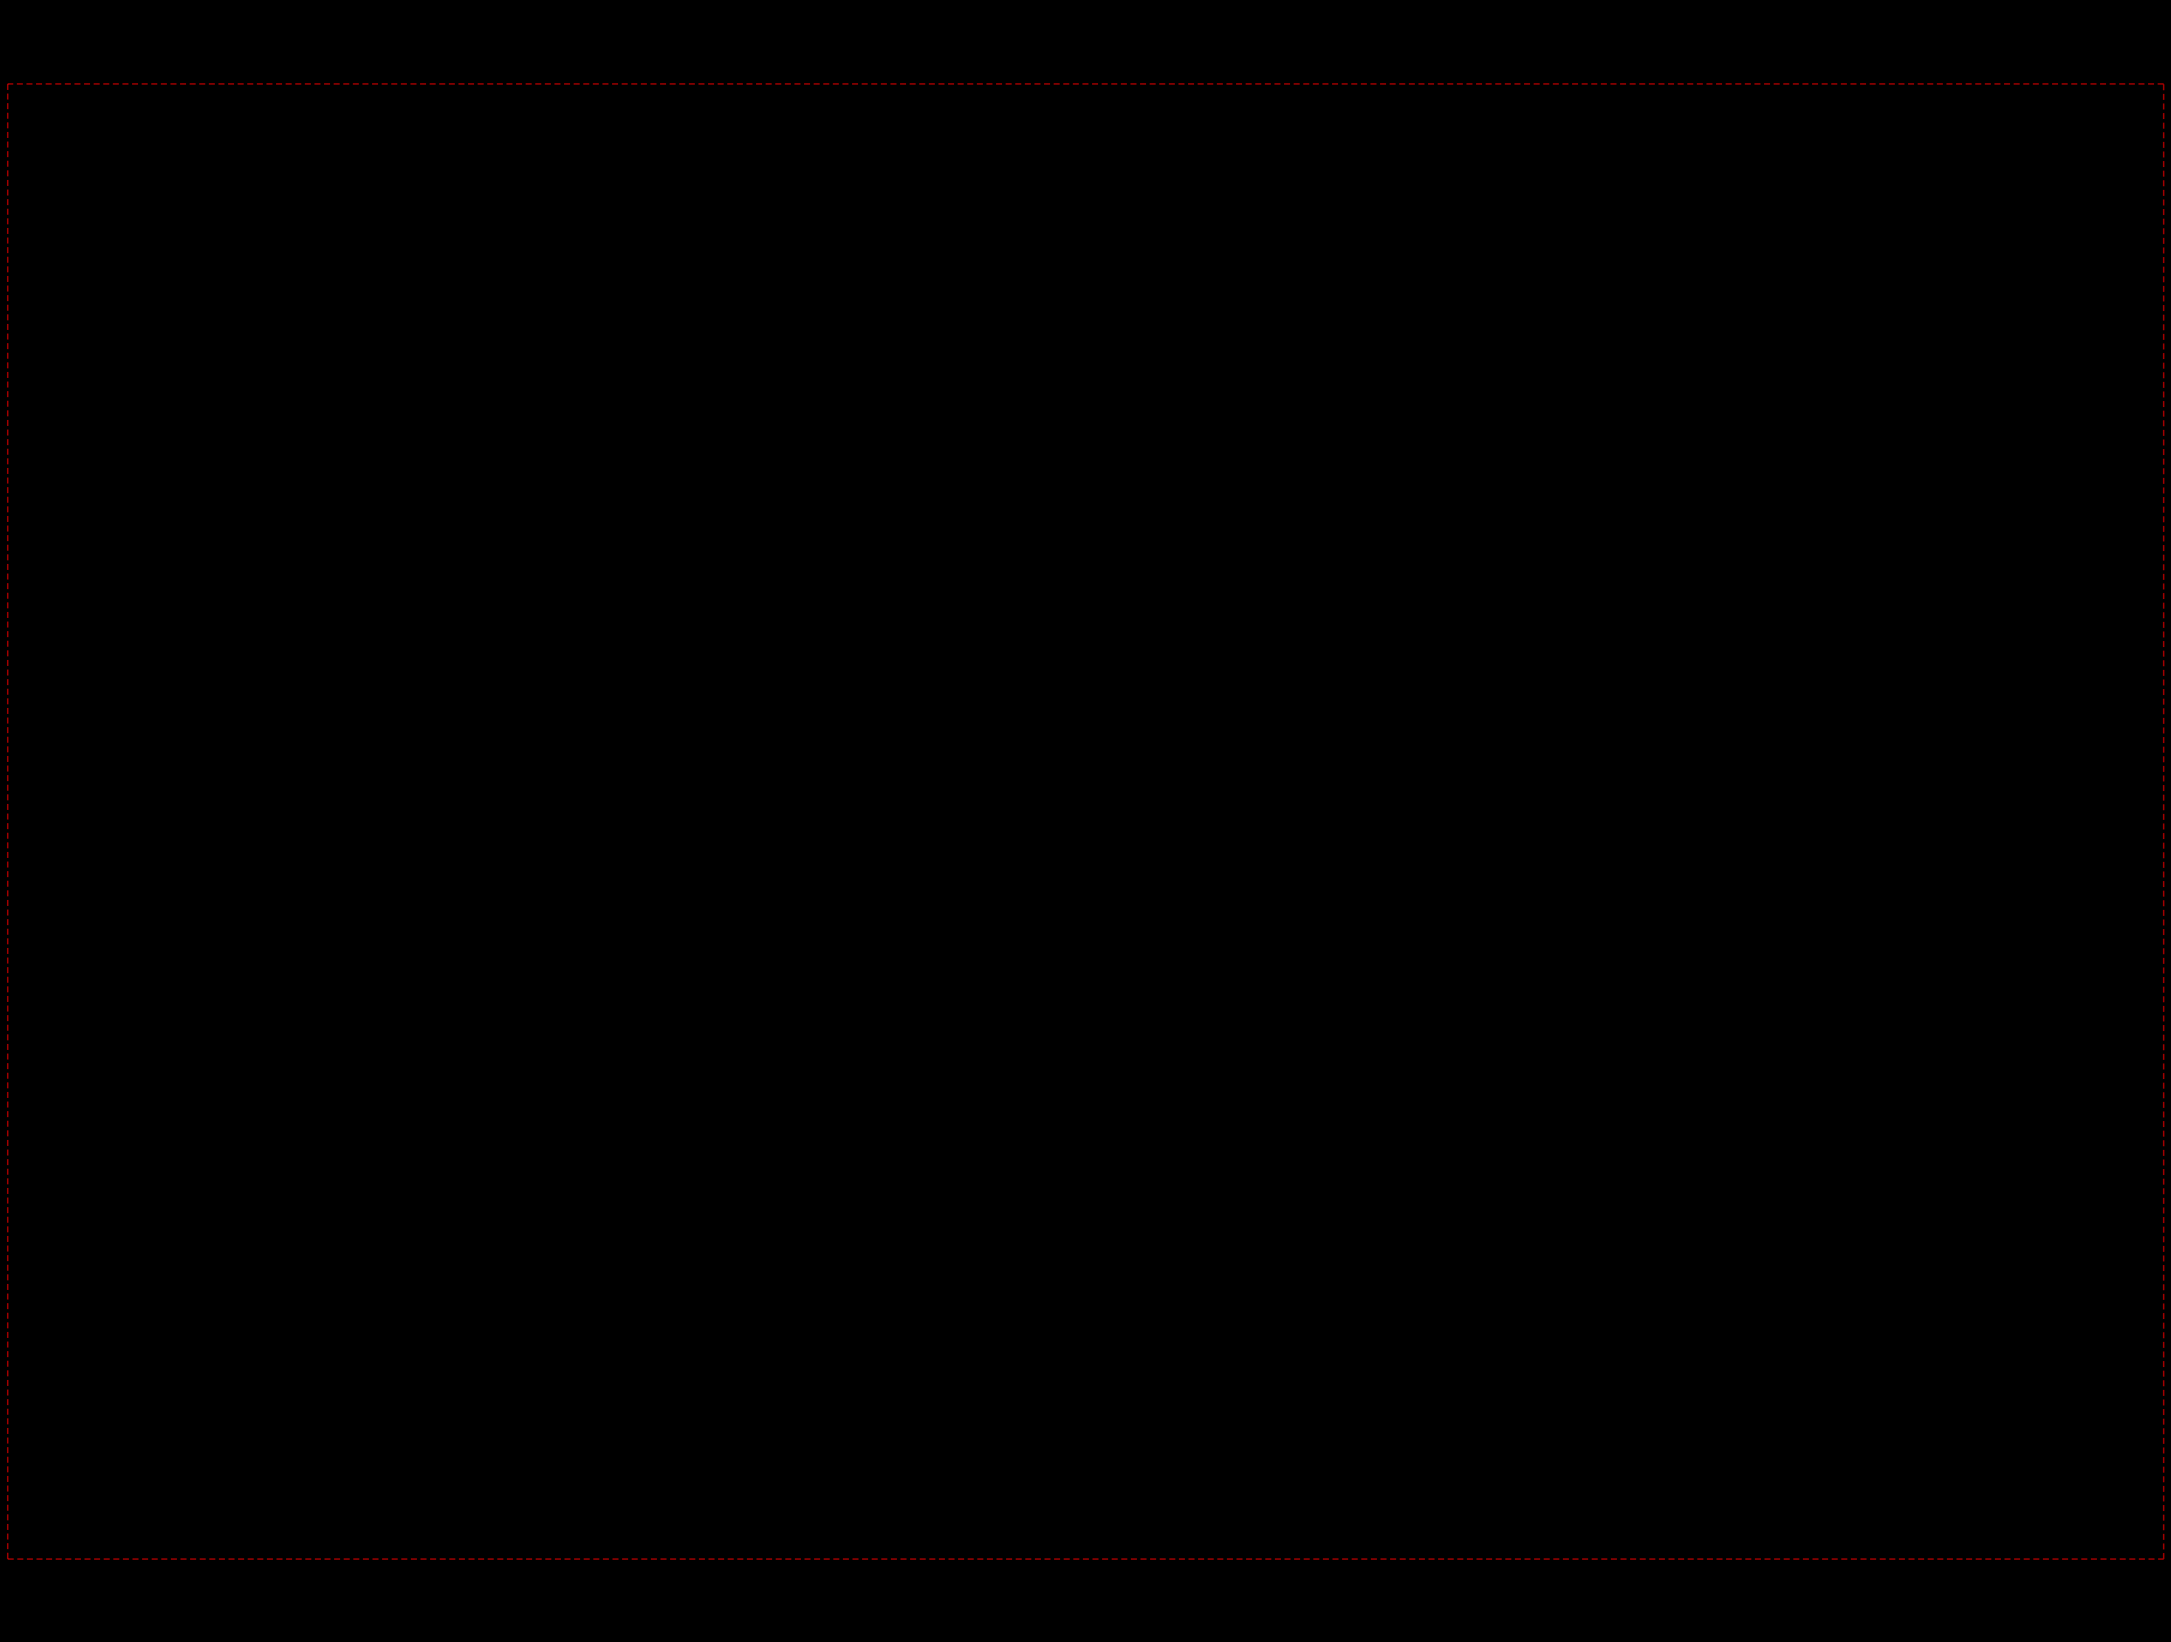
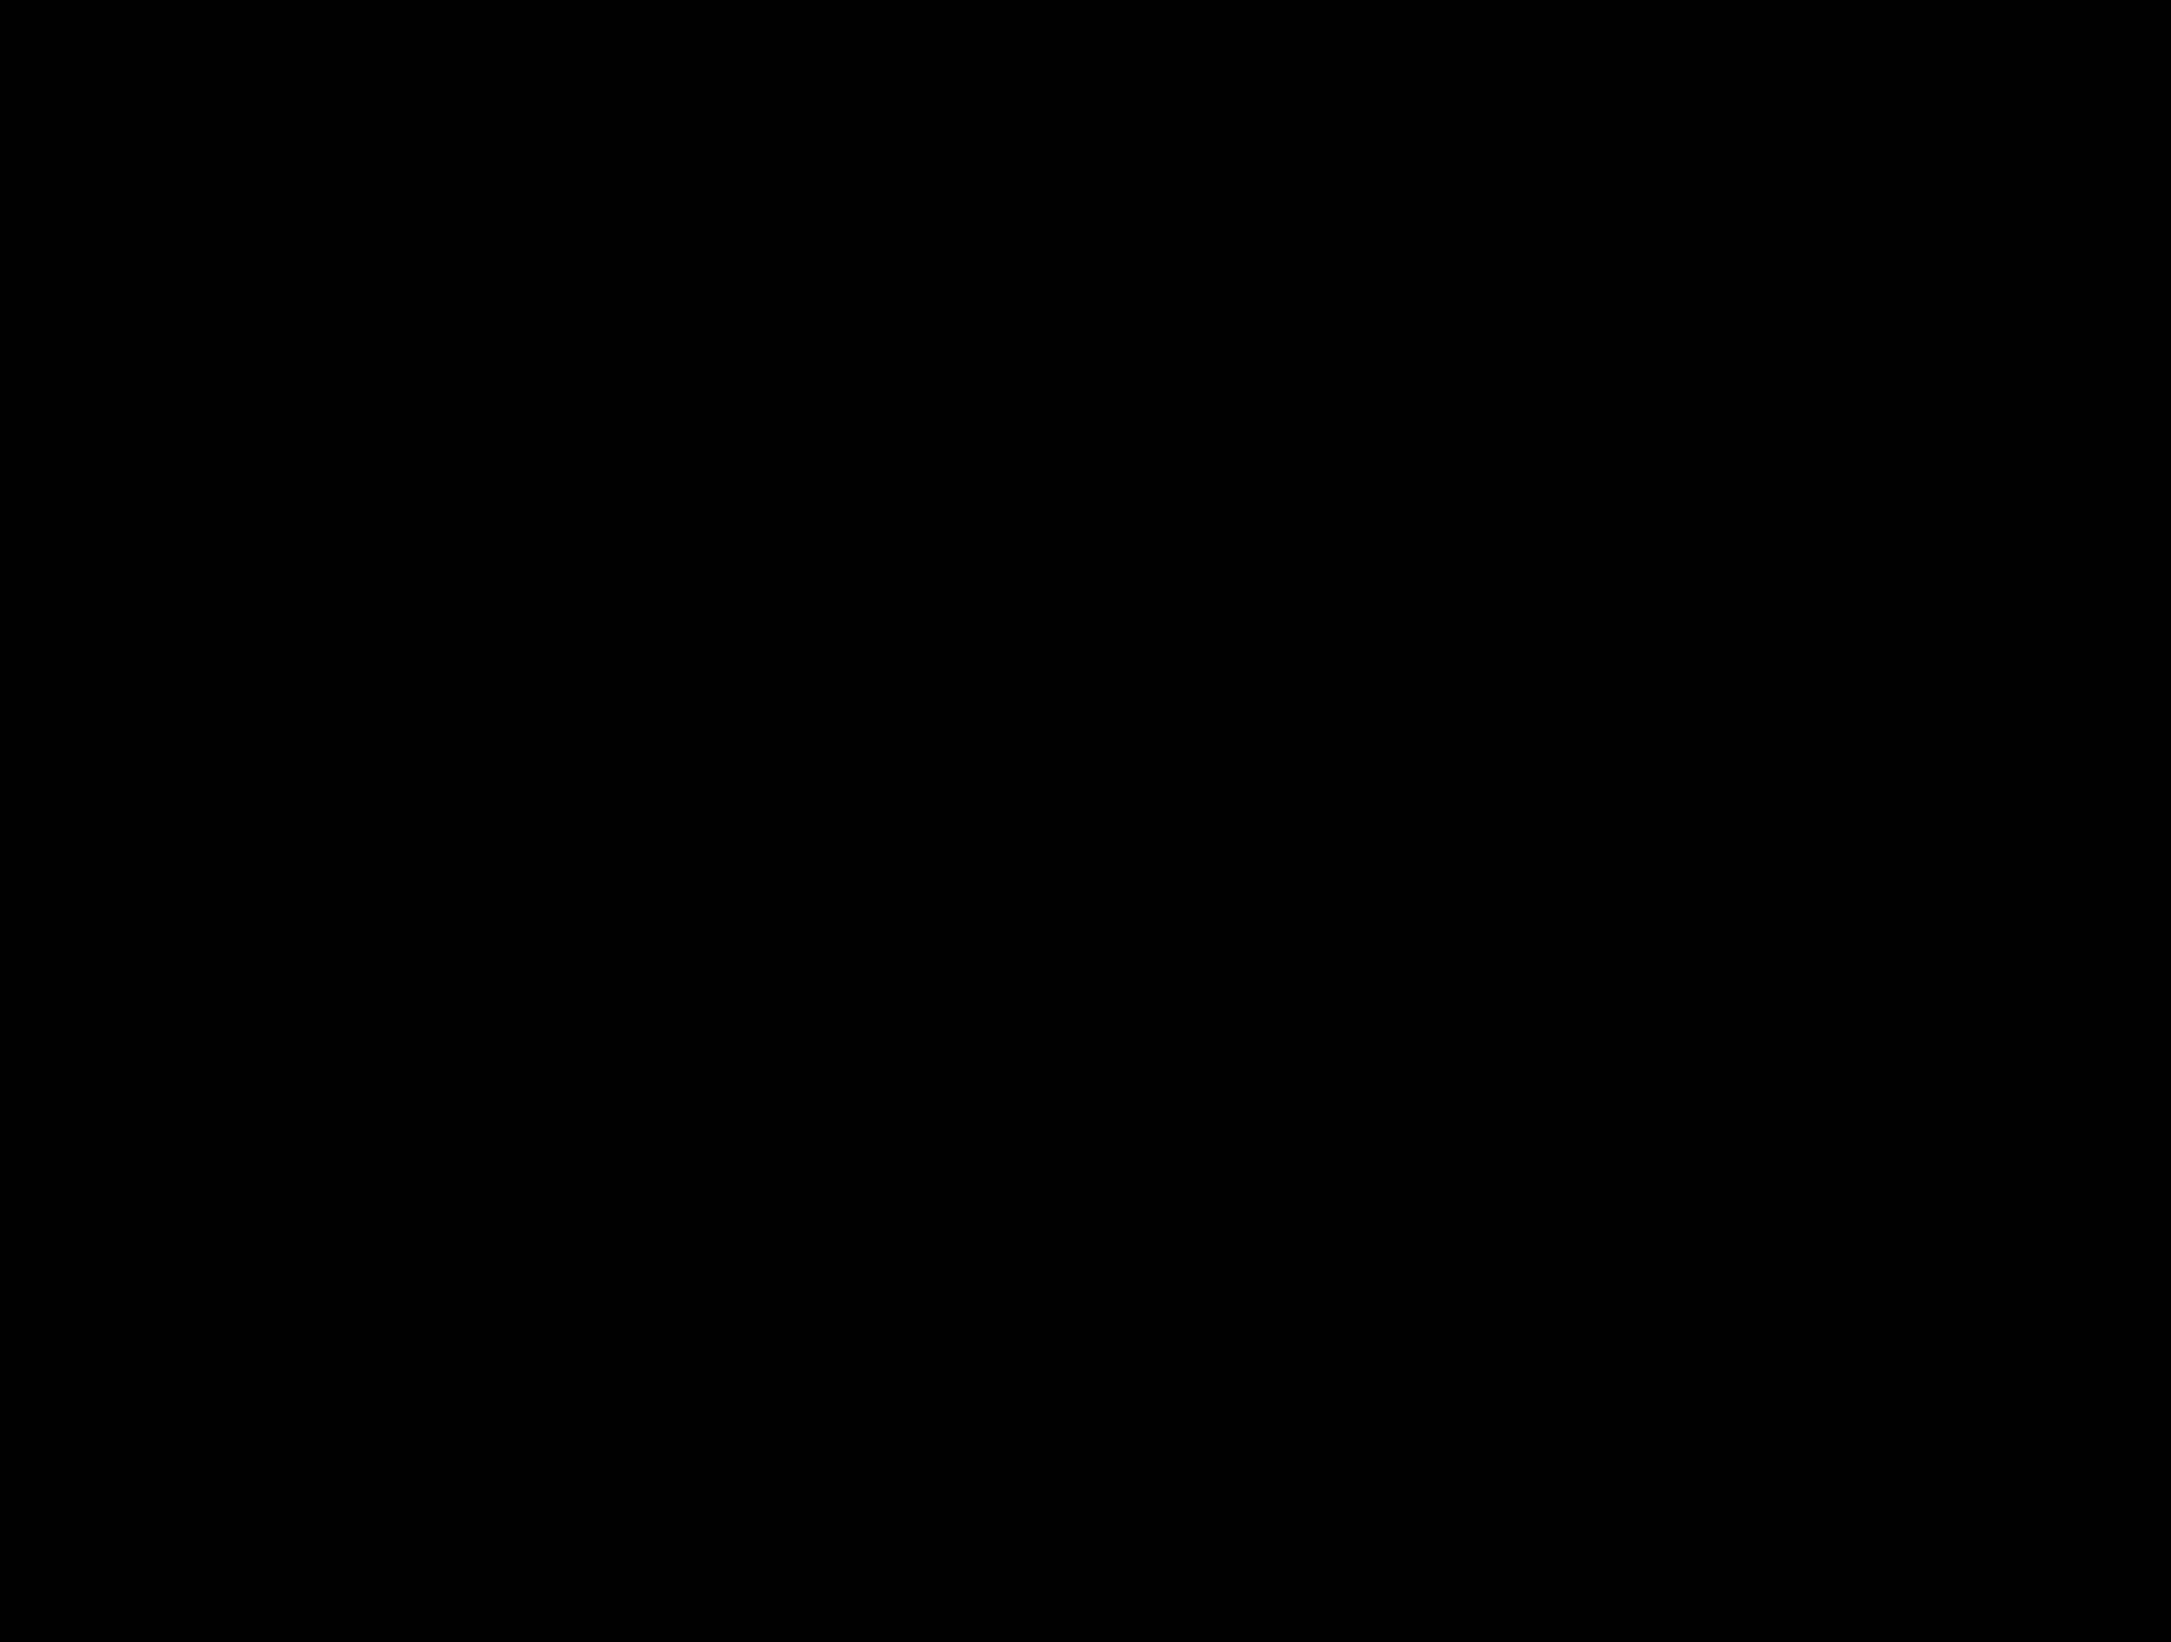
top zone outline: (2163, 83) (2163, 1559) (7, 1559) (7, 83) (2163, 83) -> none

